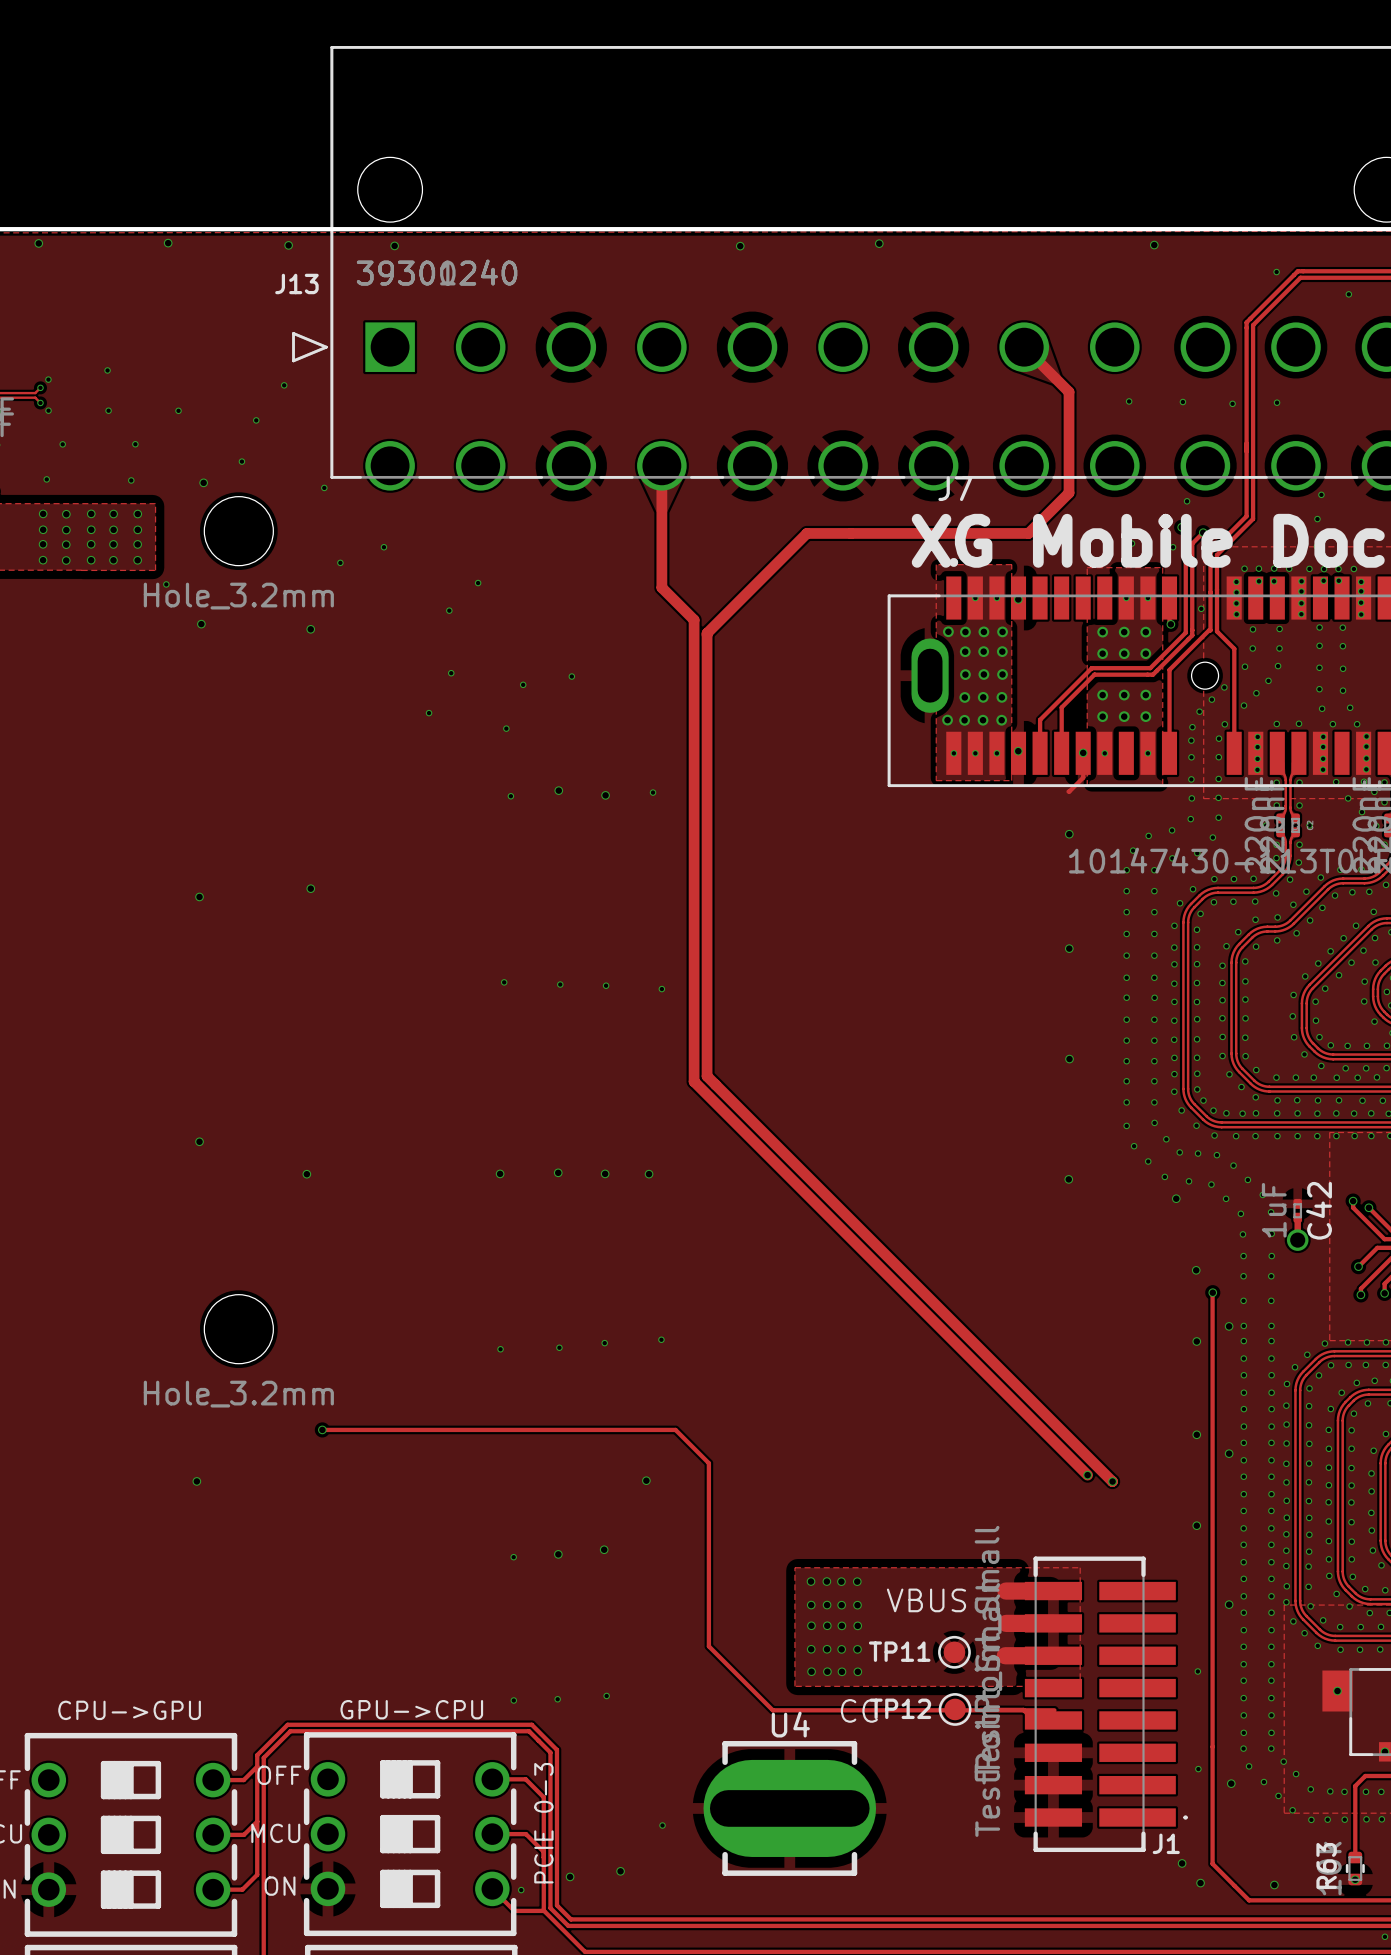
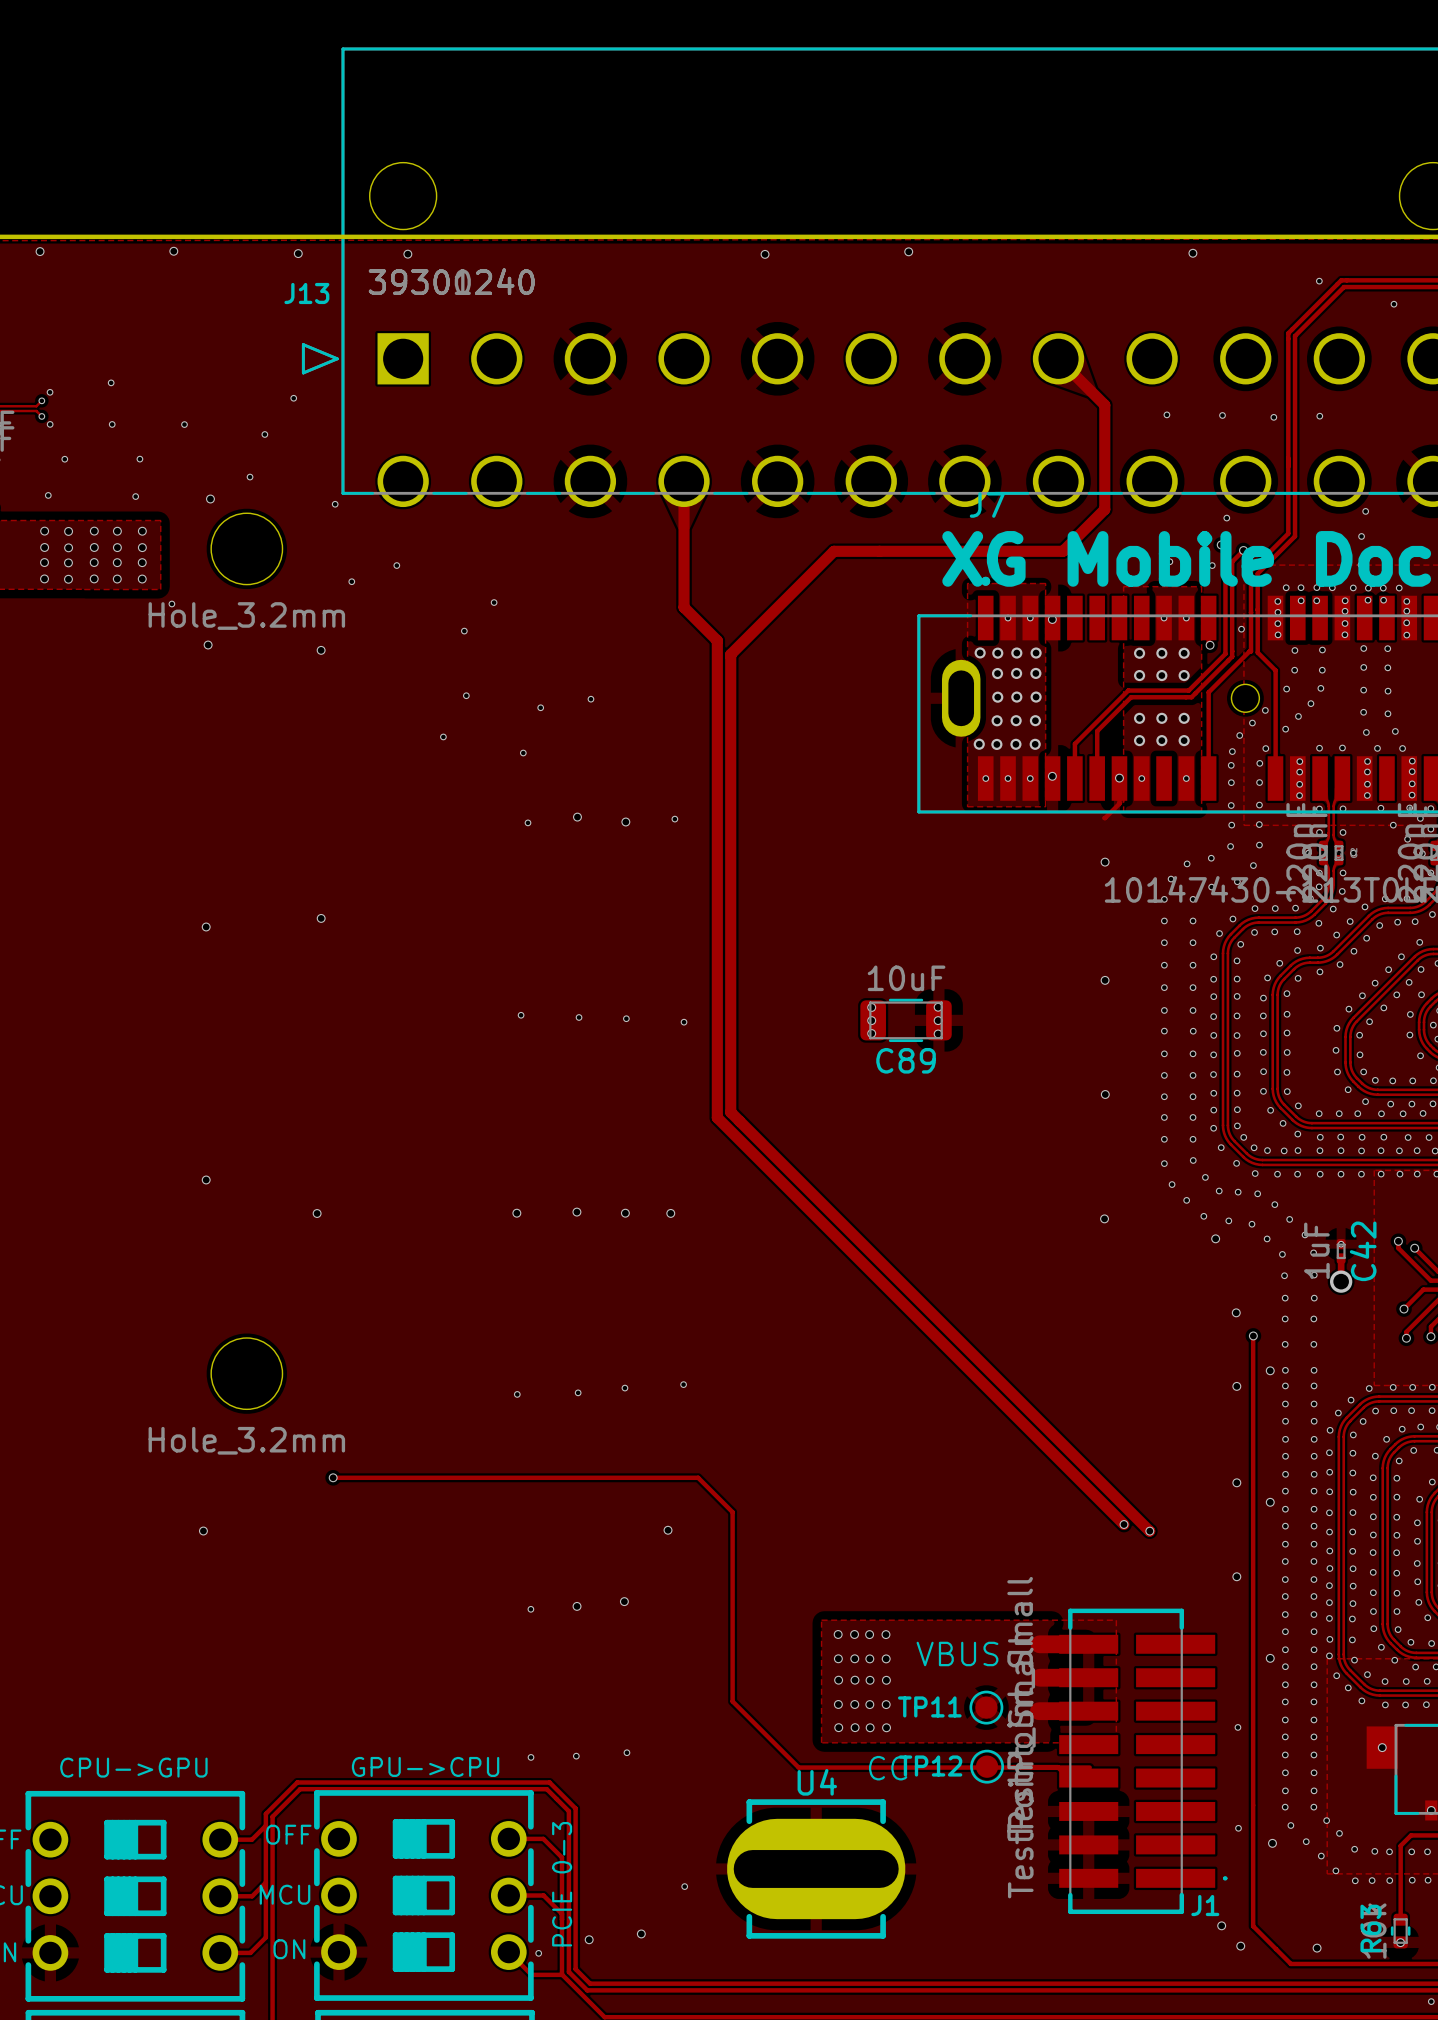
via: none -> (871, 1007)
via: none -> (938, 1007)
via: none -> (871, 1020)
C89: none -> 10uF (906, 1020)
via: none -> (938, 1020)
via: none -> (871, 1033)
via: none -> (938, 1033)
via: none -> (1341, 1244)

